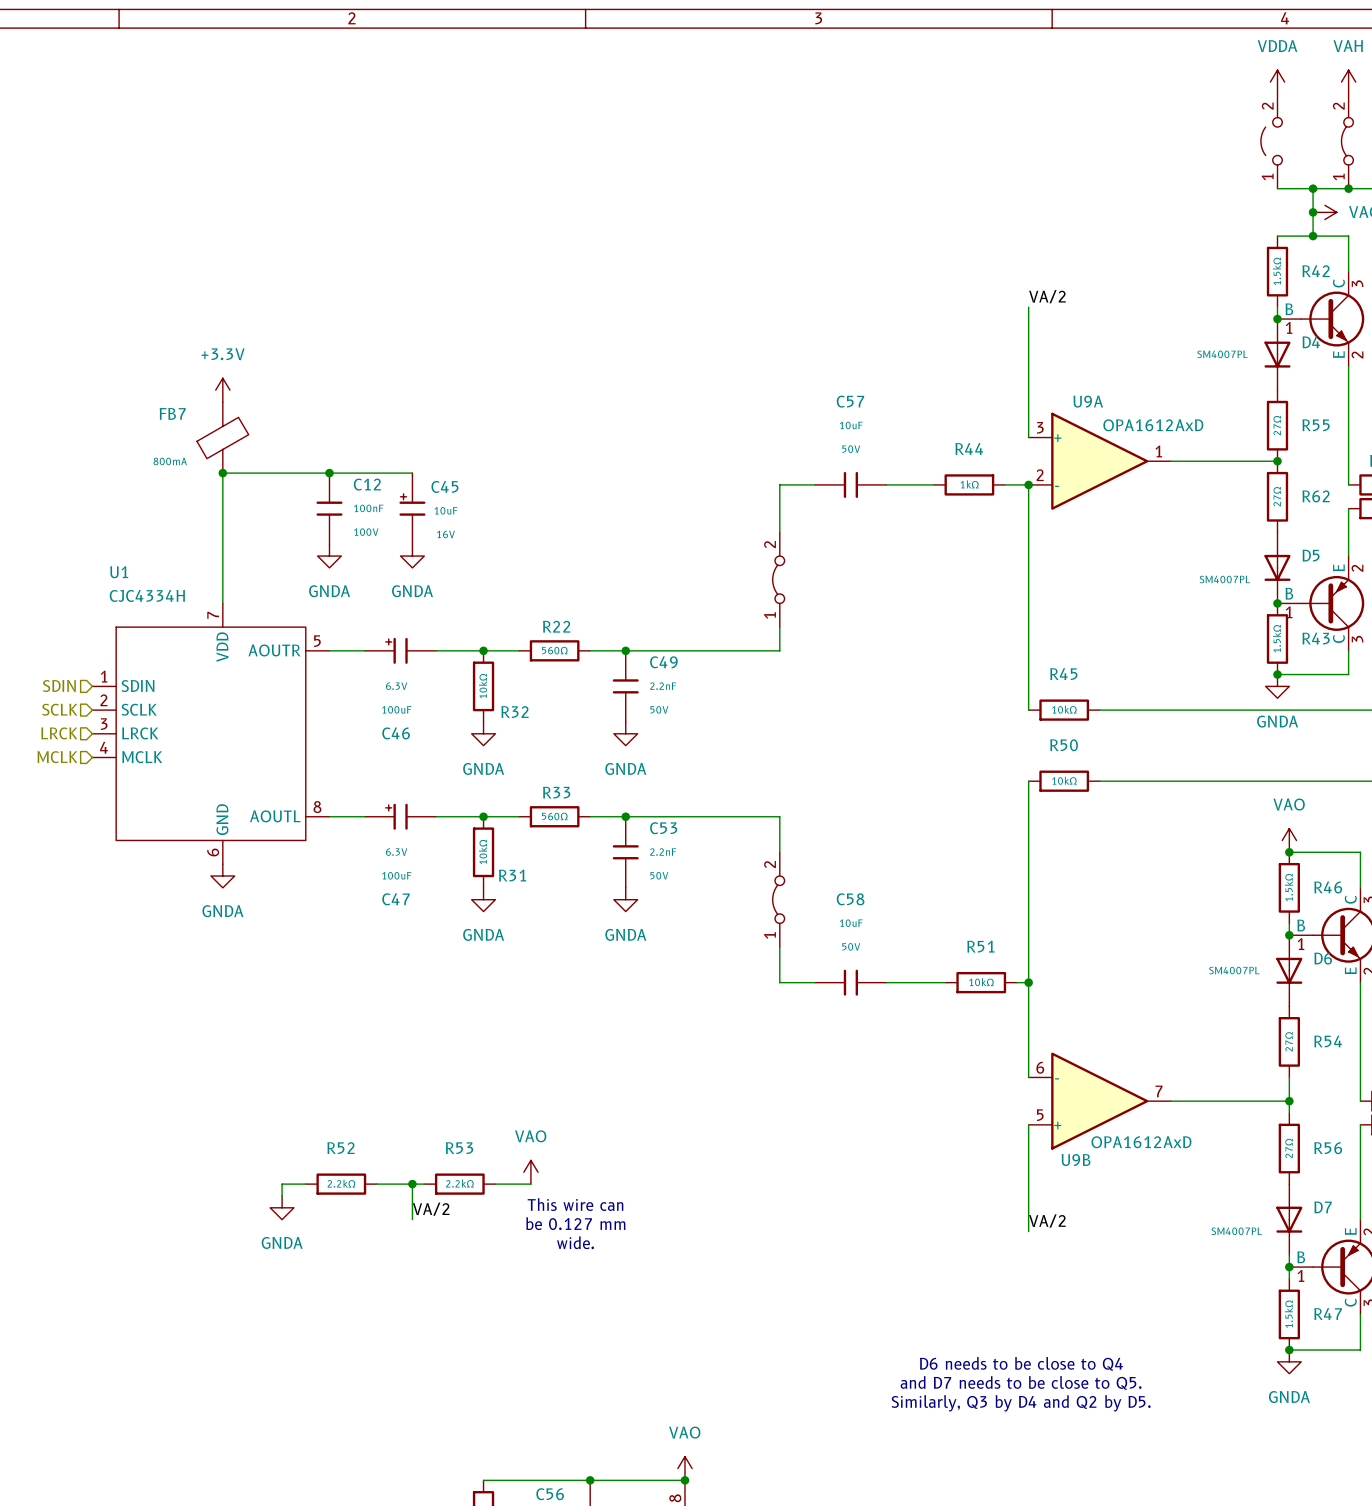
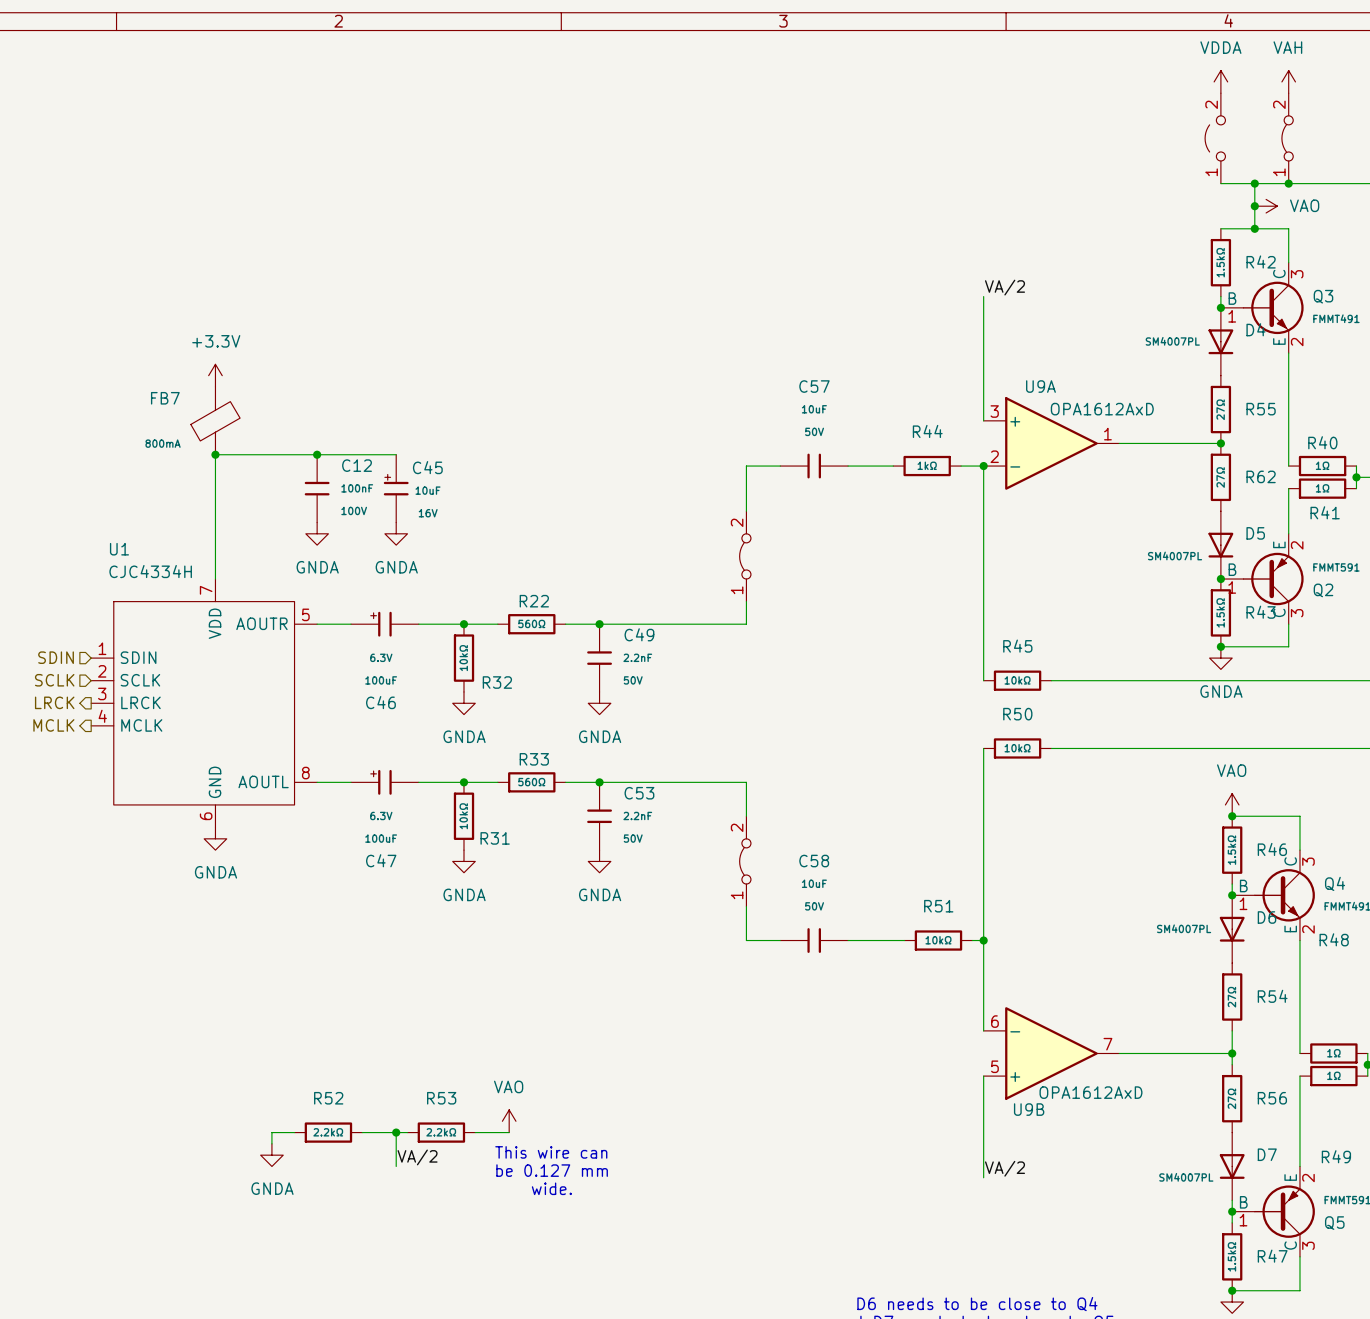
hierarchical label shape: input (59, 733) -> output (54, 702)
hierarchical label shape: input (57, 757) -> output (53, 725)

